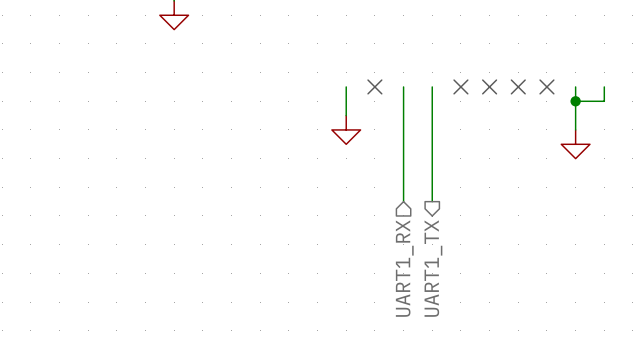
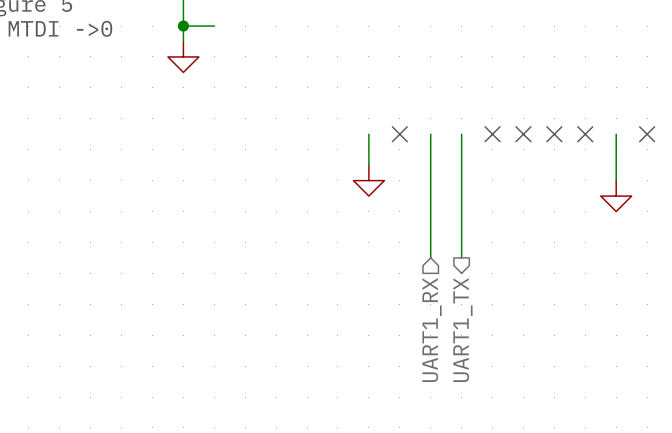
wire: (604, 86) (604, 101) (575, 101) -> none
no-connect mark: none -> (647, 134)
junction: (575, 101) -> none

